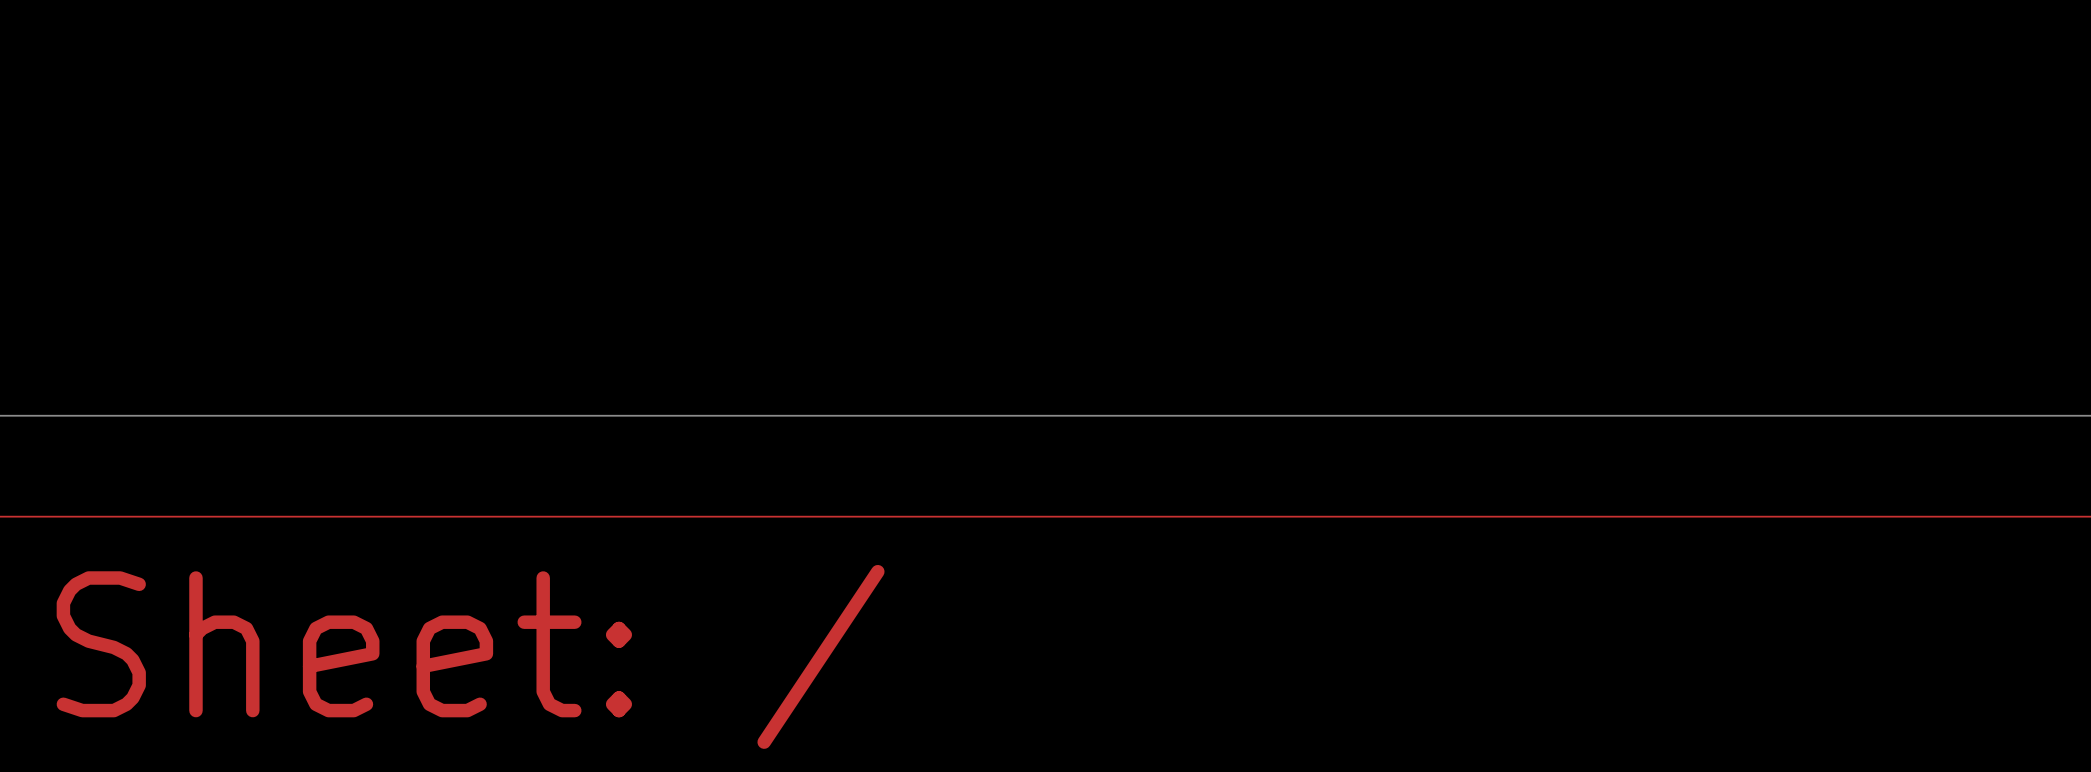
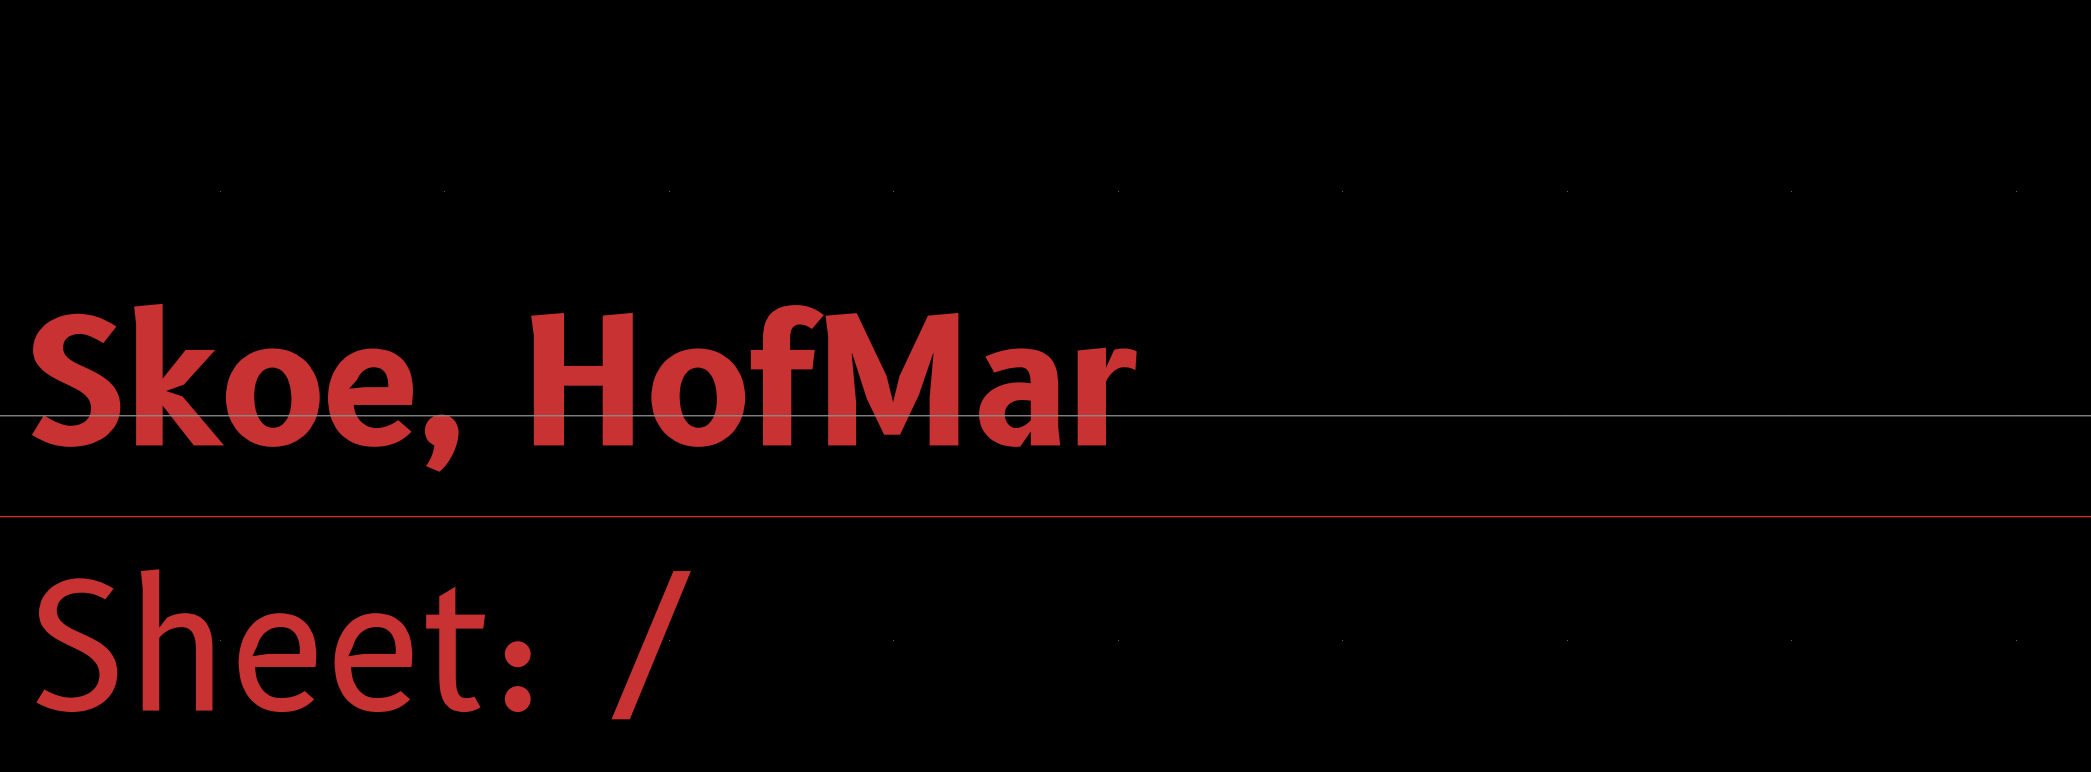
title block: none -> Skoe, HofMar (584, 387)

